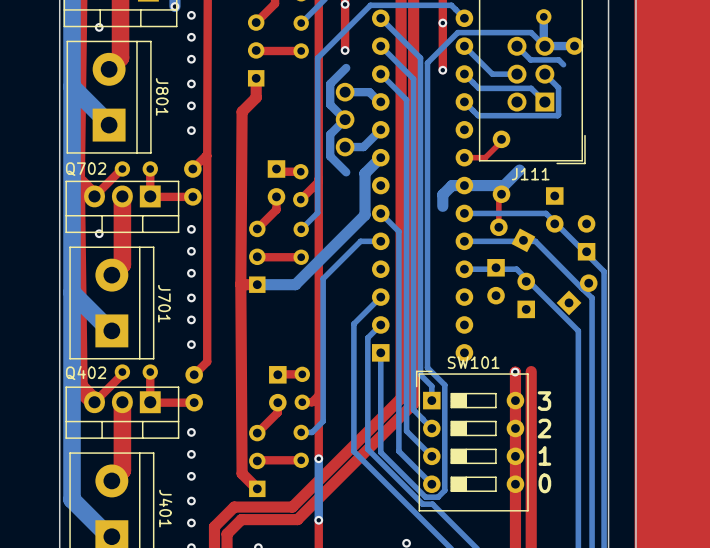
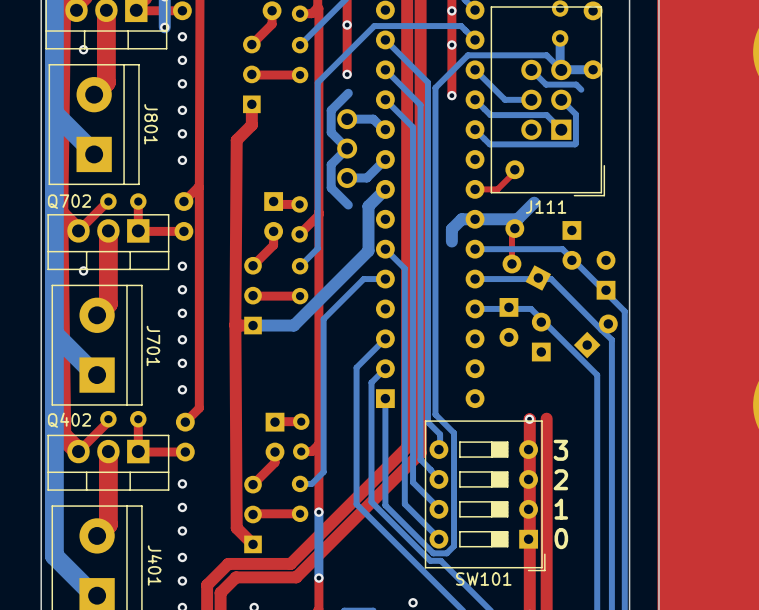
SW101 rotation: 0° (472, 441) -> 180° (485, 495)

